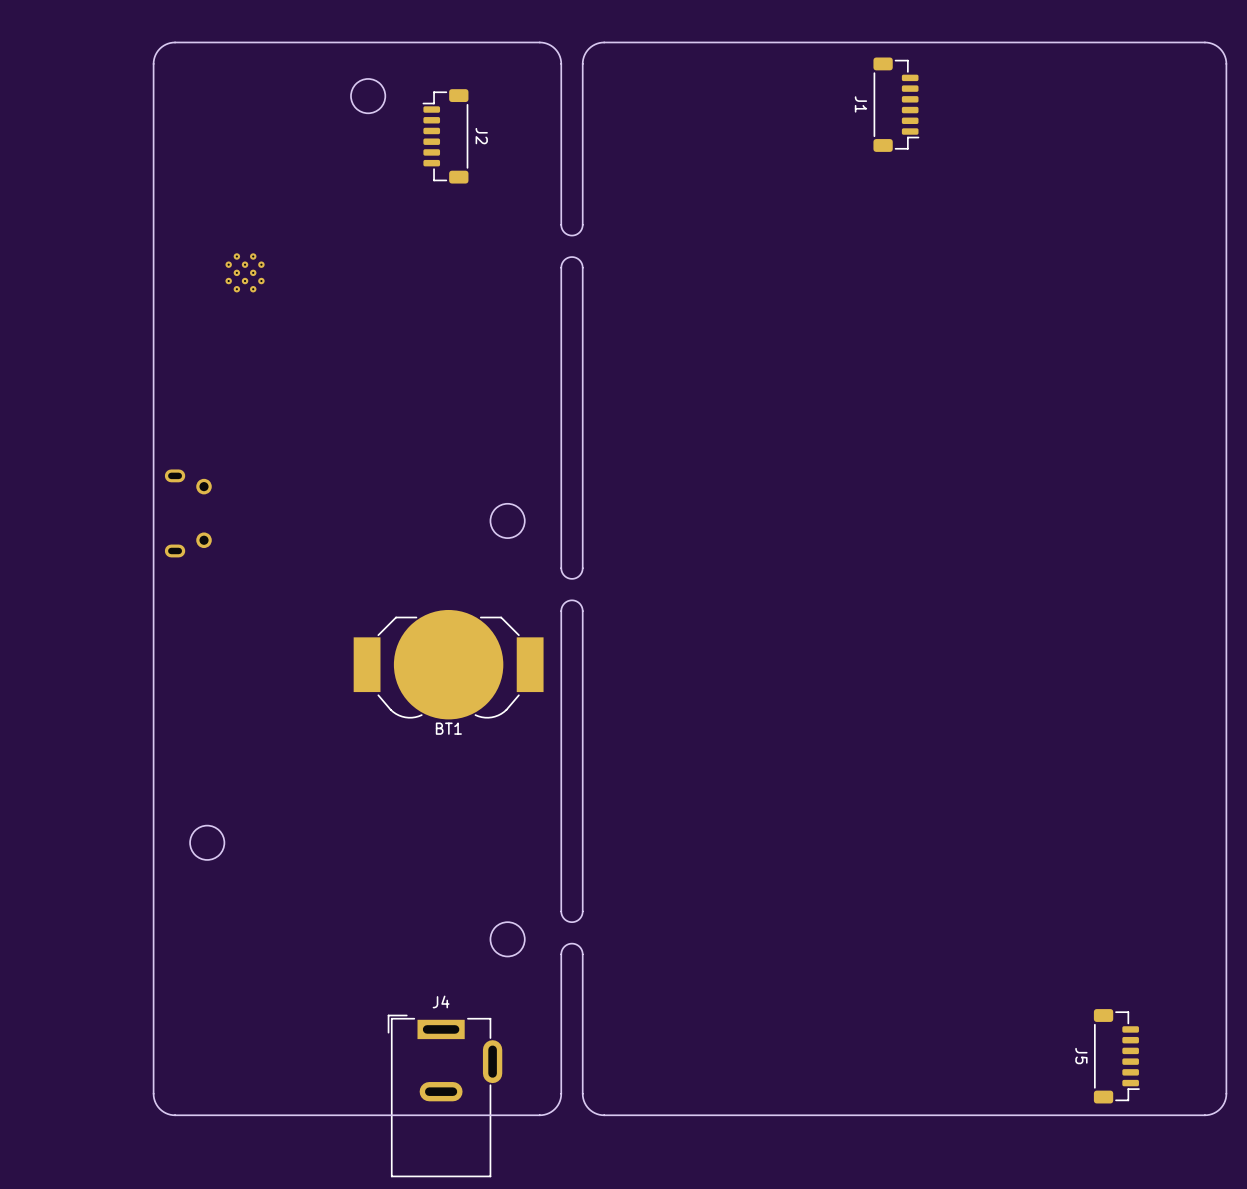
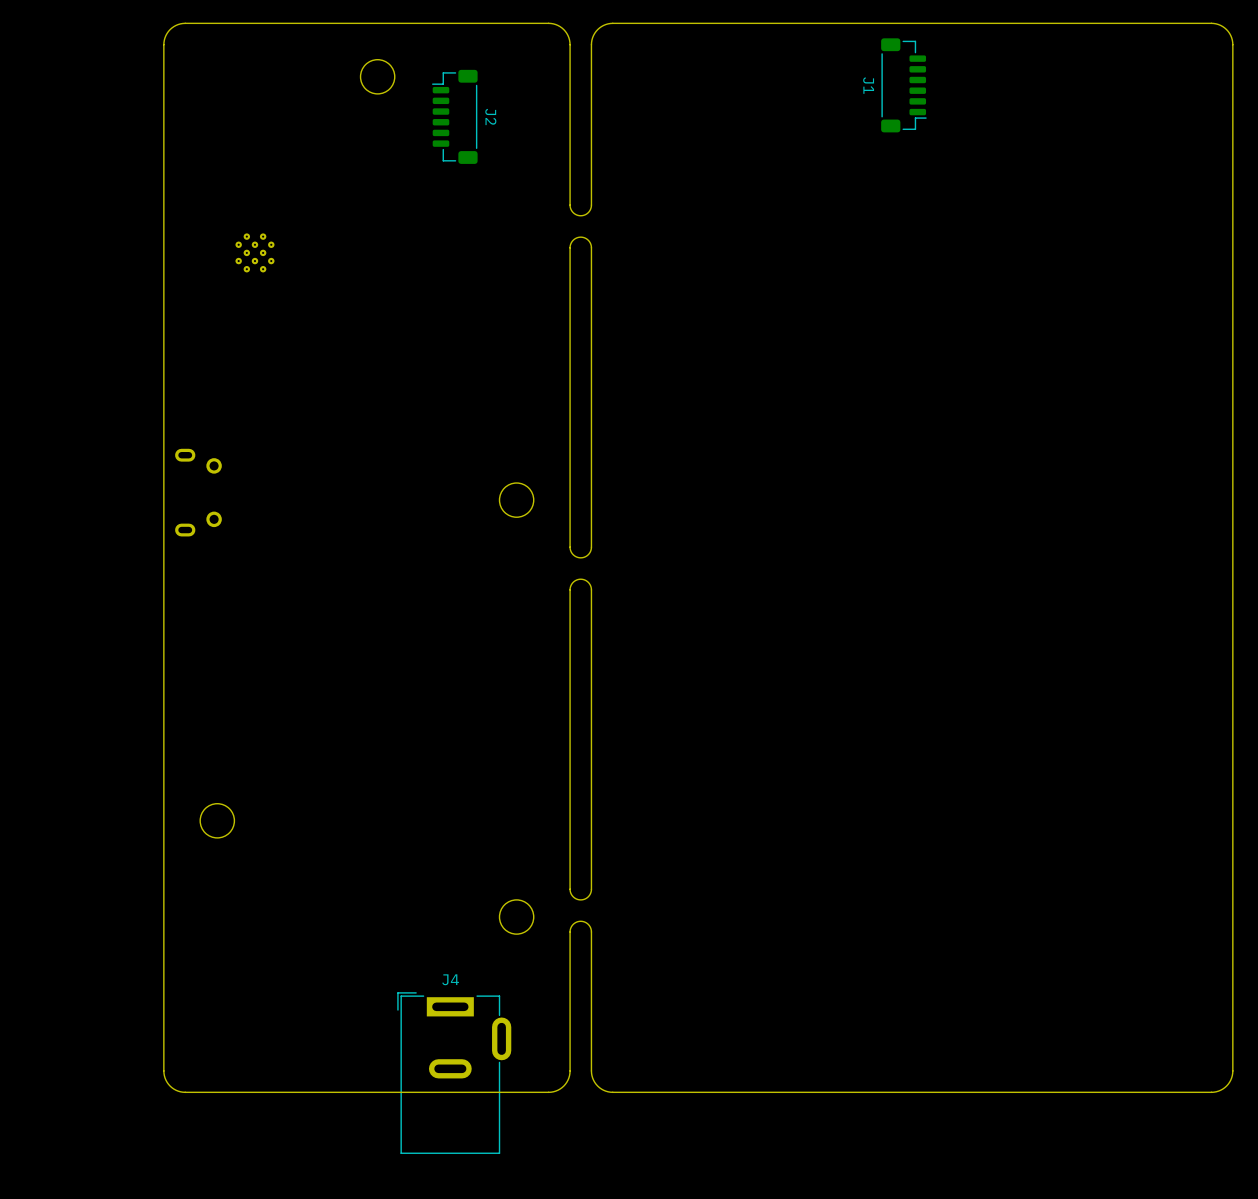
BT1: (448, 664) -> none
J5: (1116, 1056) -> none

